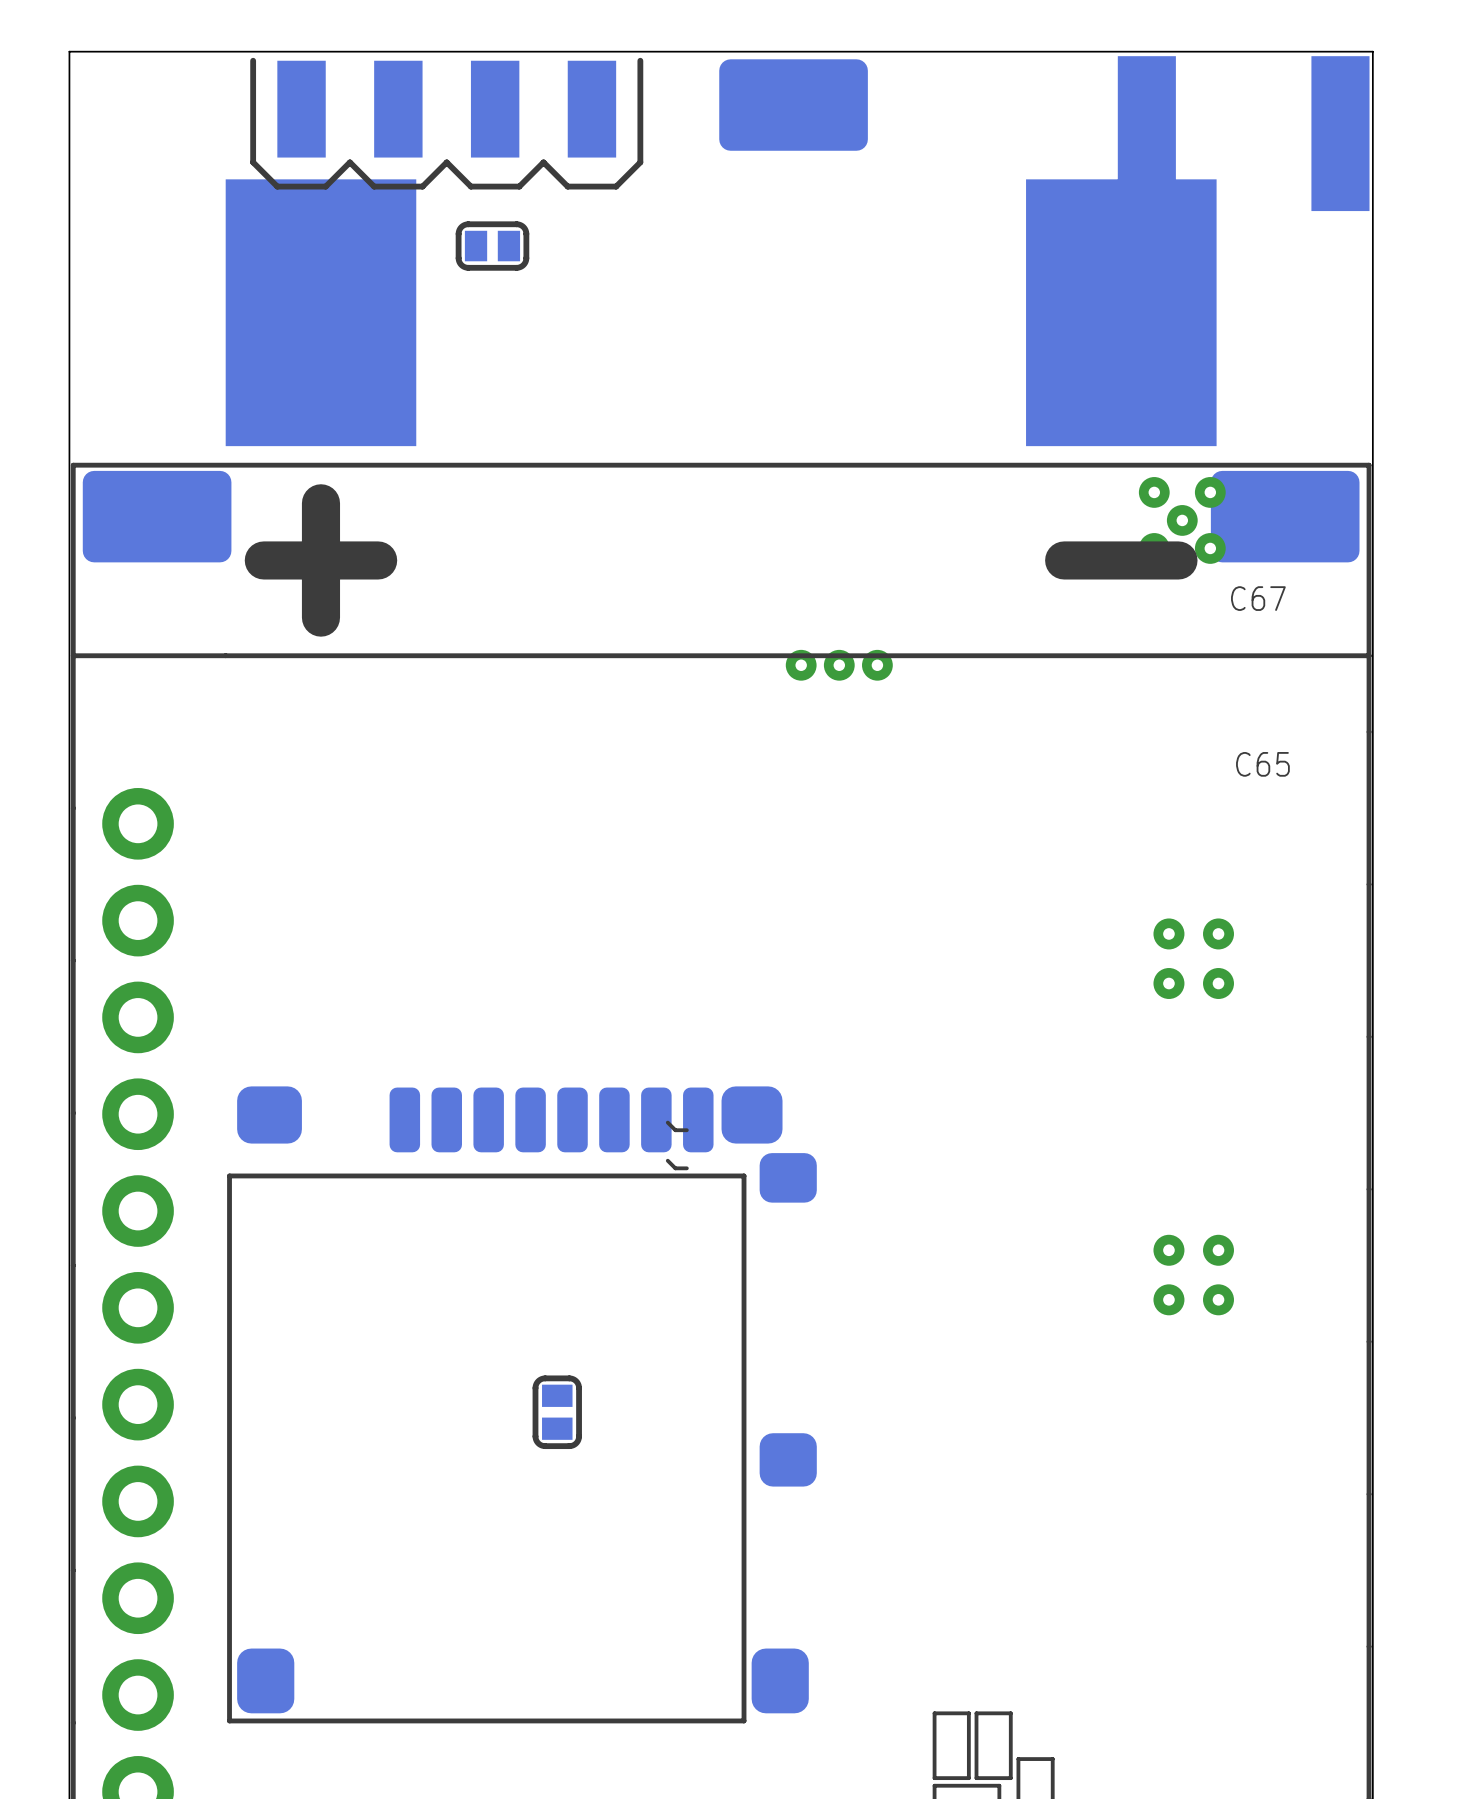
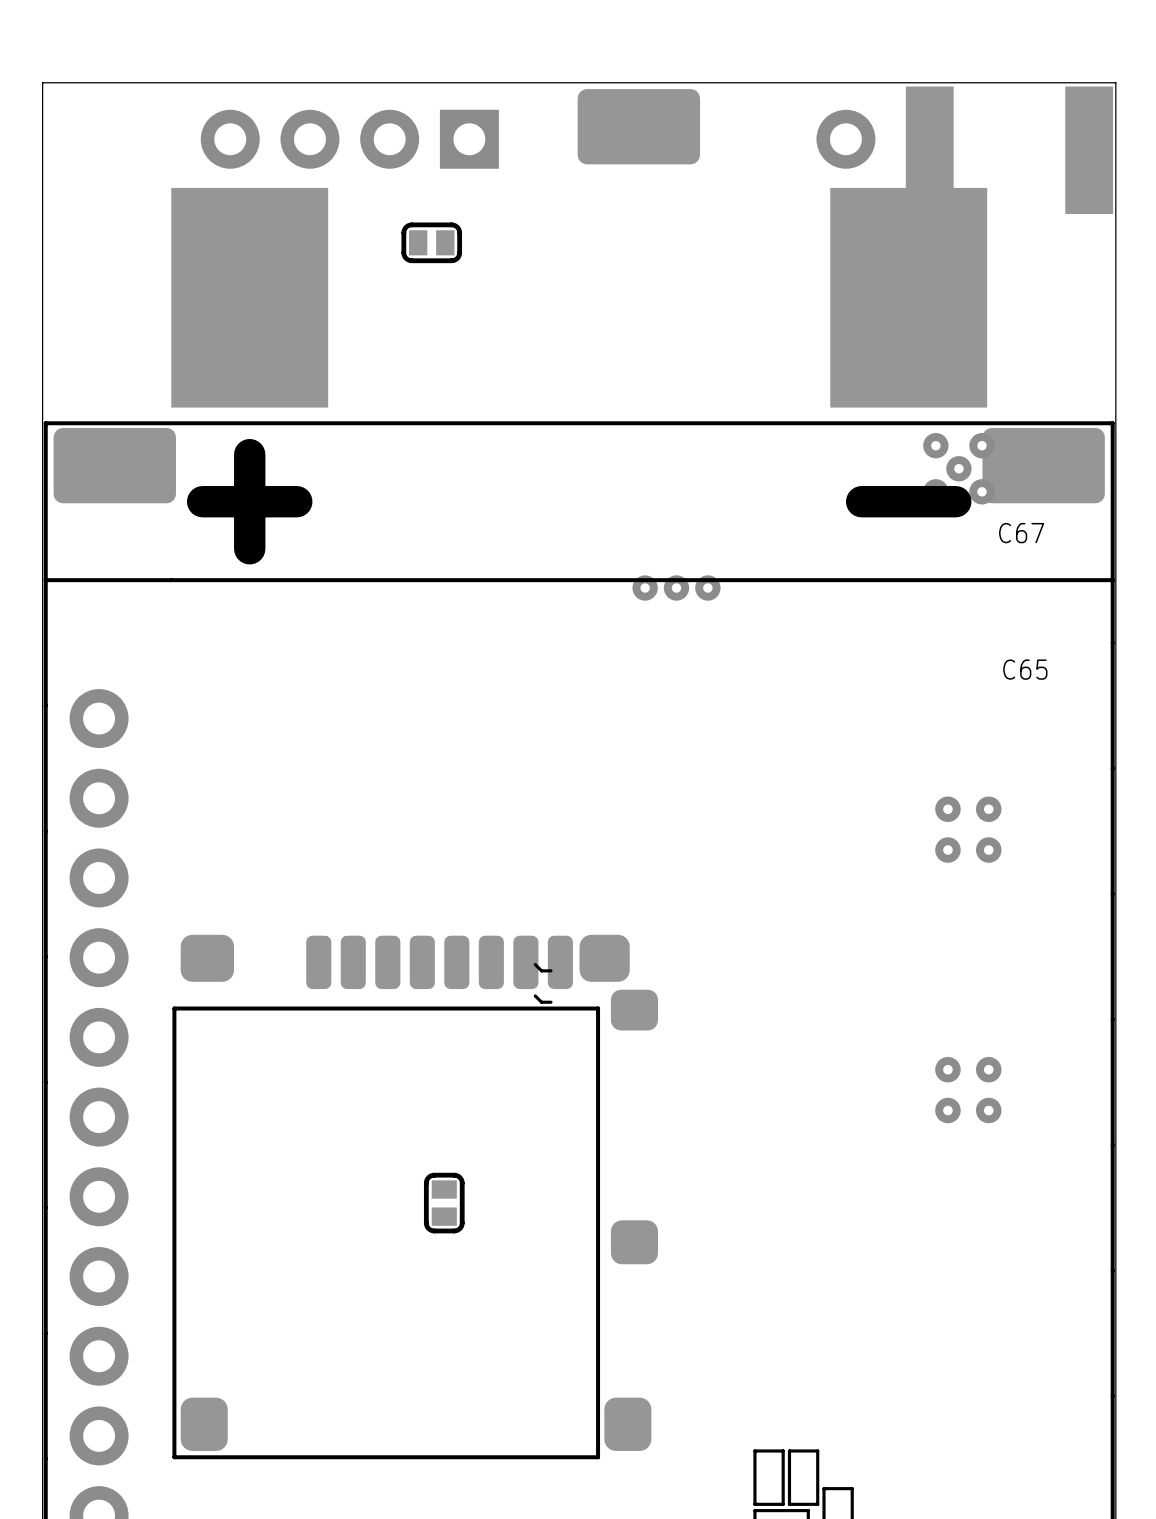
part footprint: [250, 57, 644, 190] -> [200, 109, 499, 169]
part: none -> (845, 139)
part position: (492, 246) -> (431, 242)

